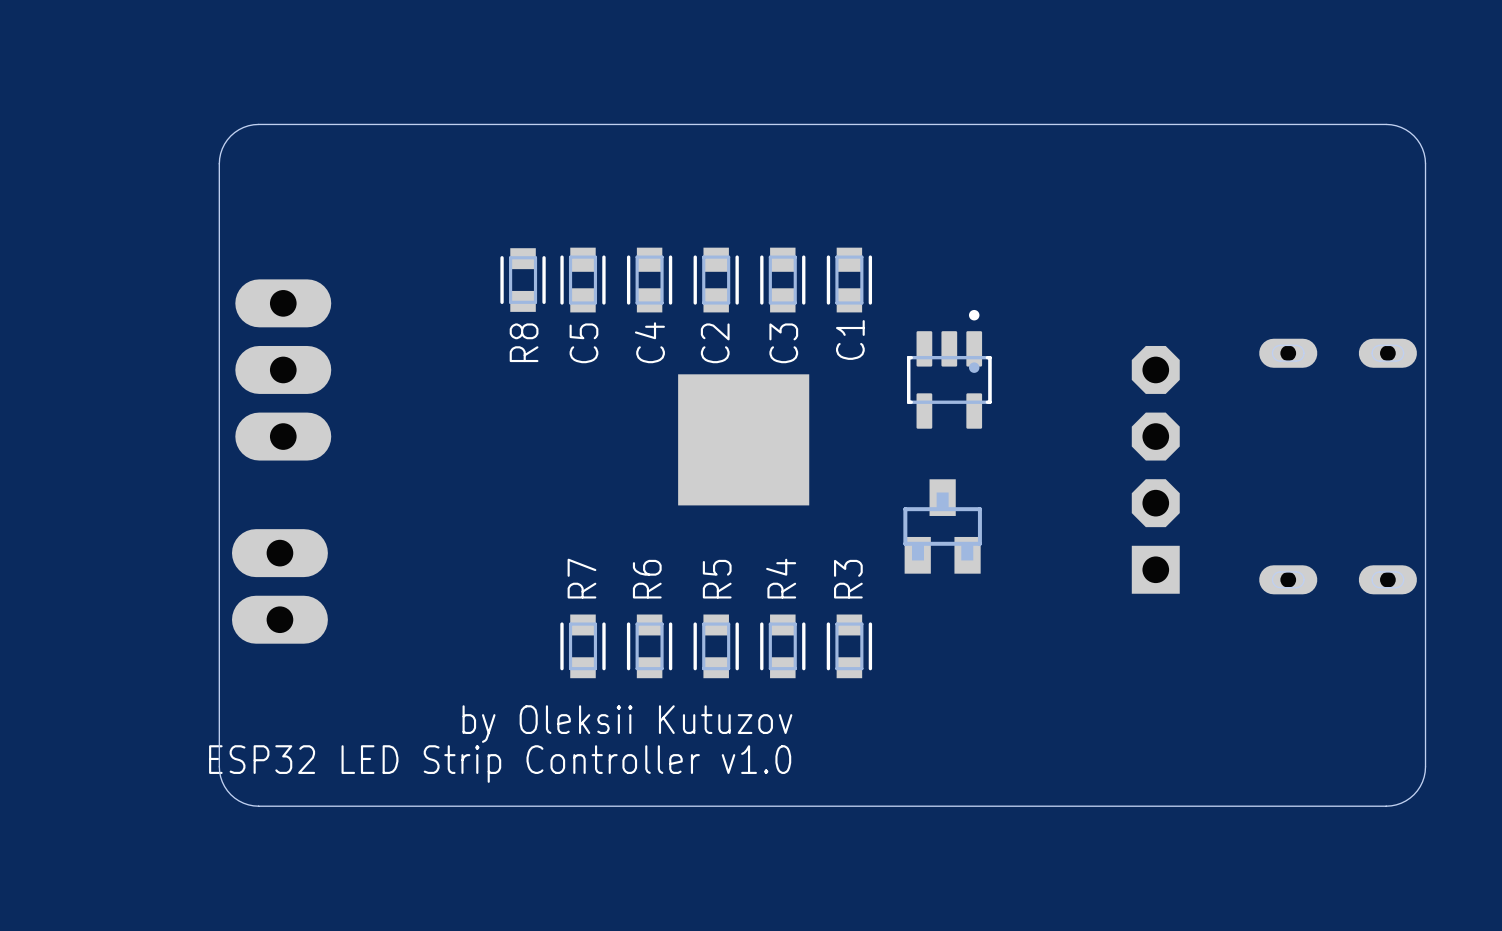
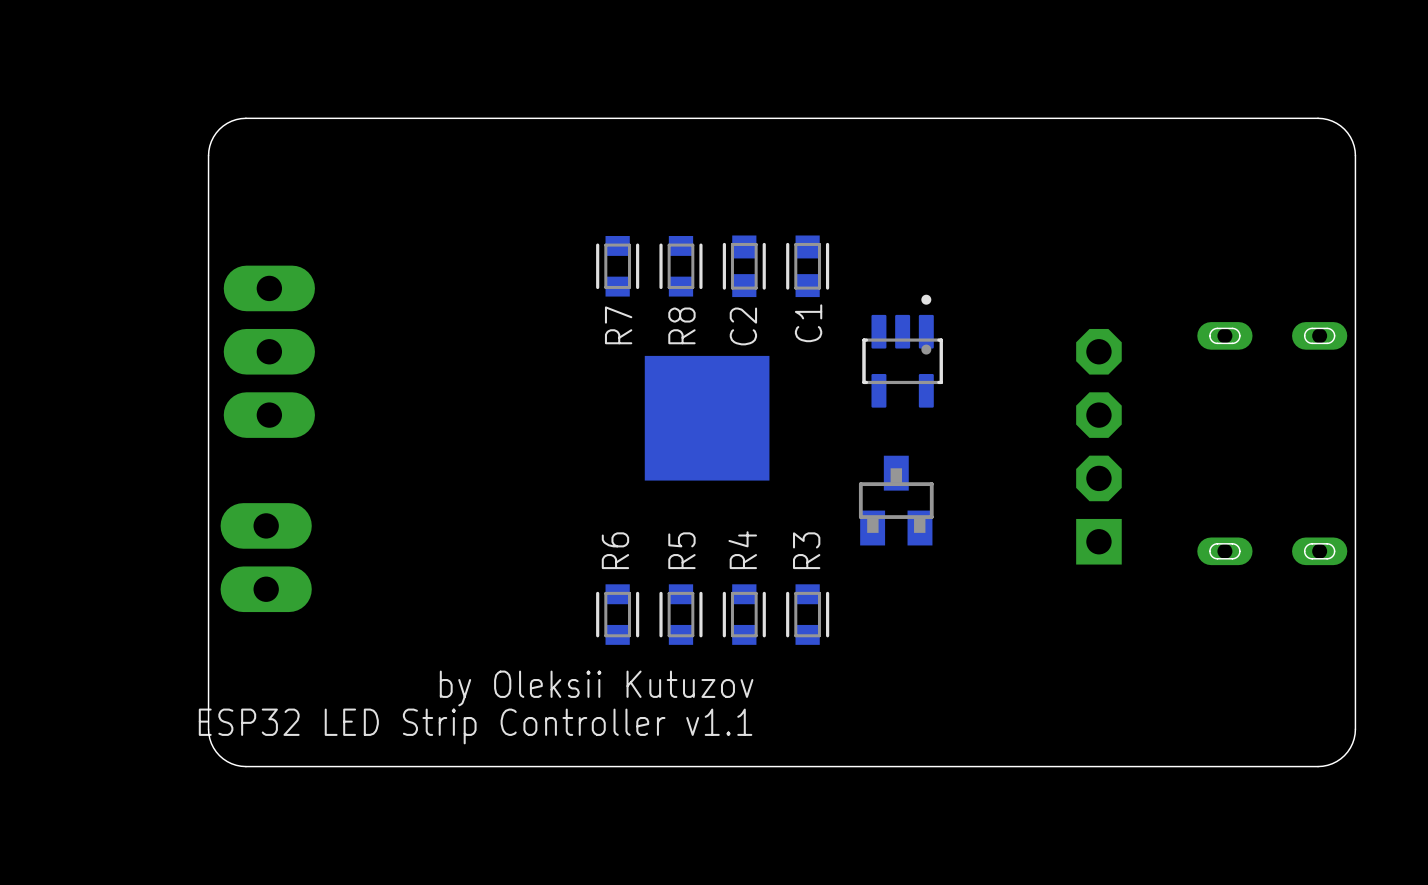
R8 position: (523, 280) -> (680, 266)
C5: (582, 280) -> none
C4: (649, 280) -> none
C2: (716, 280) -> none
C3 name: C3 (783, 343) -> C2 (743, 326)
R7 name position: R7 (581, 578) -> R7 (618, 325)
R7 position: (582, 646) -> (617, 266)
text: ESP32 LED Strip Controller v1.0 (500, 764) -> ESP32 LED Strip Controller v1.1 (475, 726)

